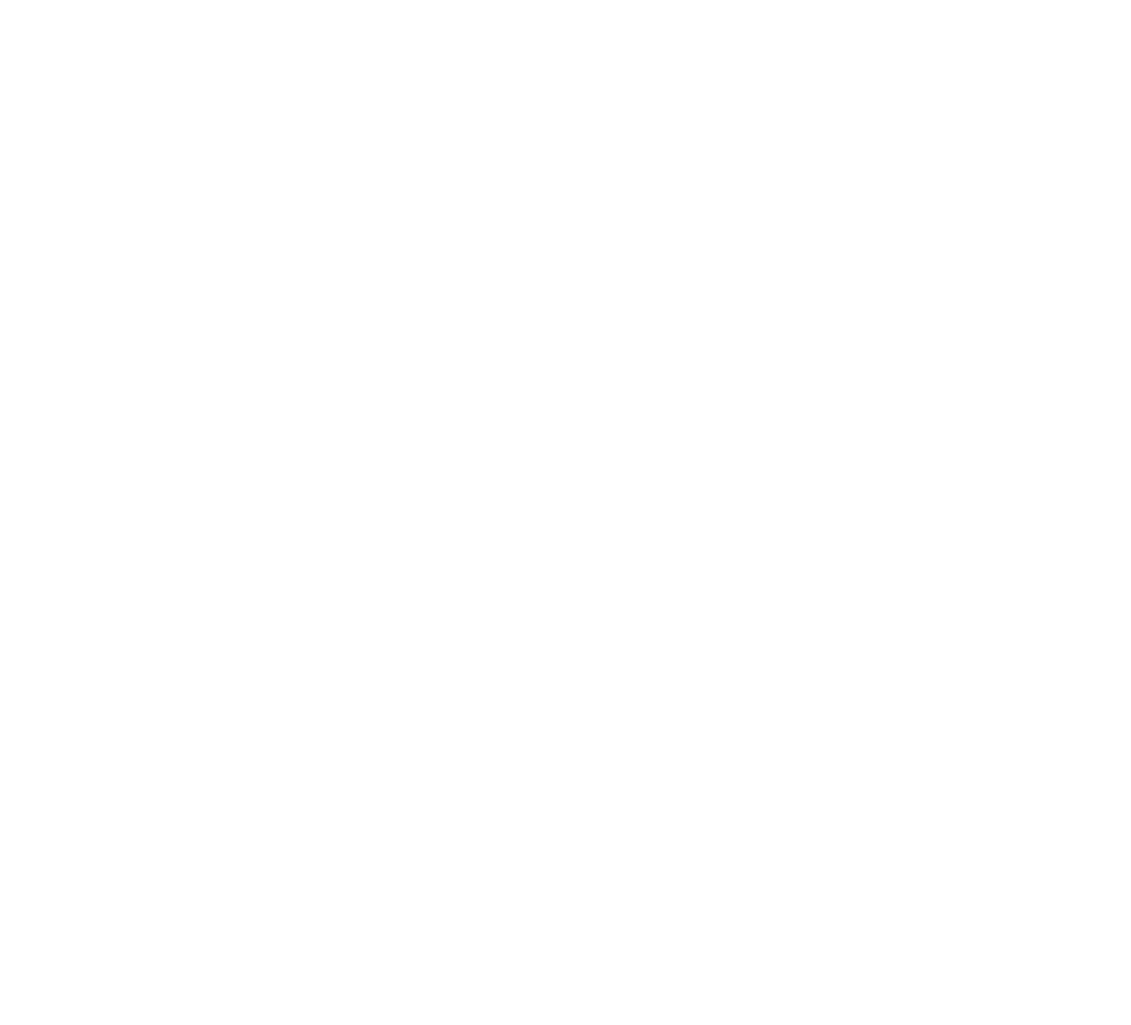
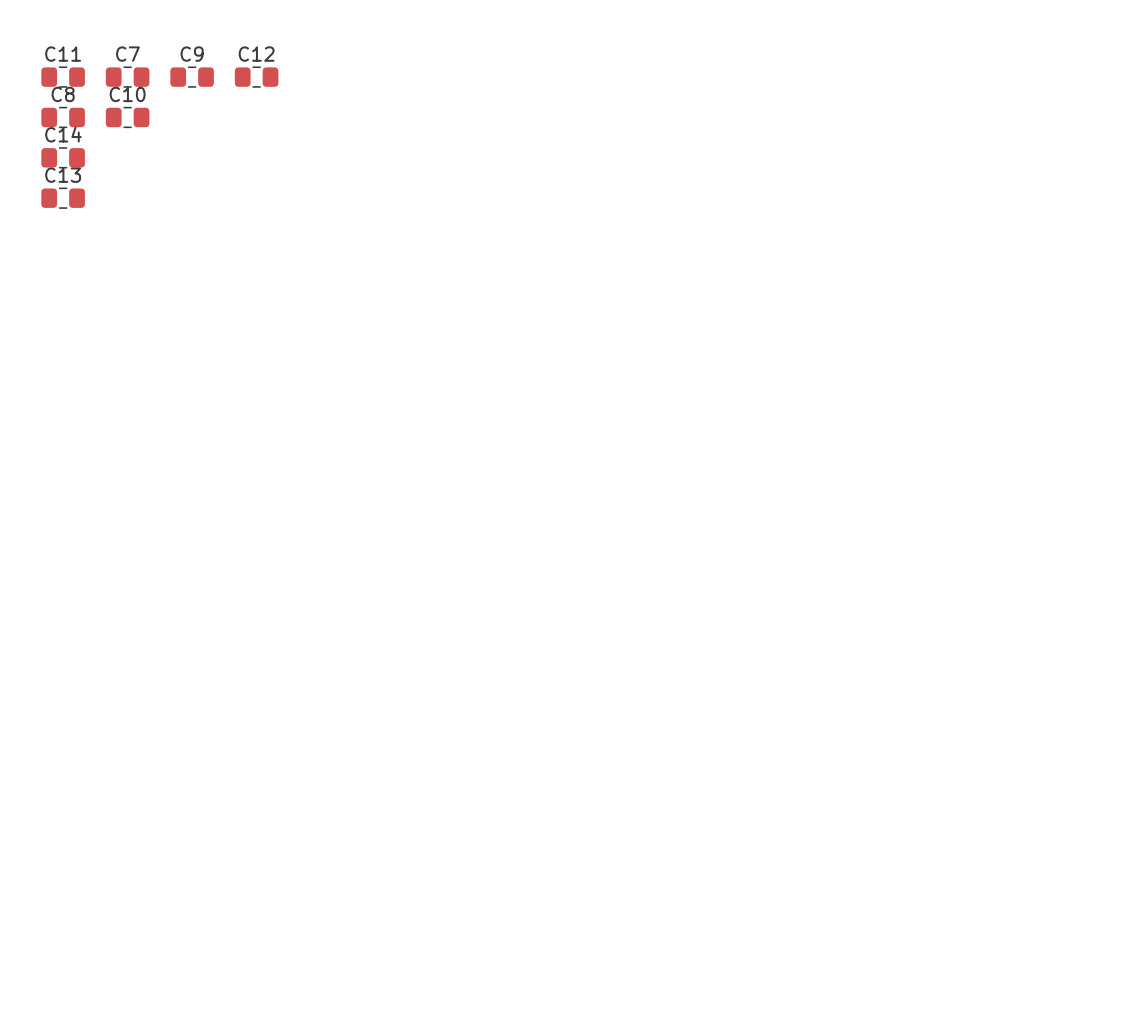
C11: none -> (63, 77)
C7: none -> (127, 77)
C9: none -> (192, 77)
C12: none -> (256, 77)
C8: none -> (63, 117)
C10: none -> (127, 117)
C14: none -> (63, 157)
C13: none -> (63, 198)

